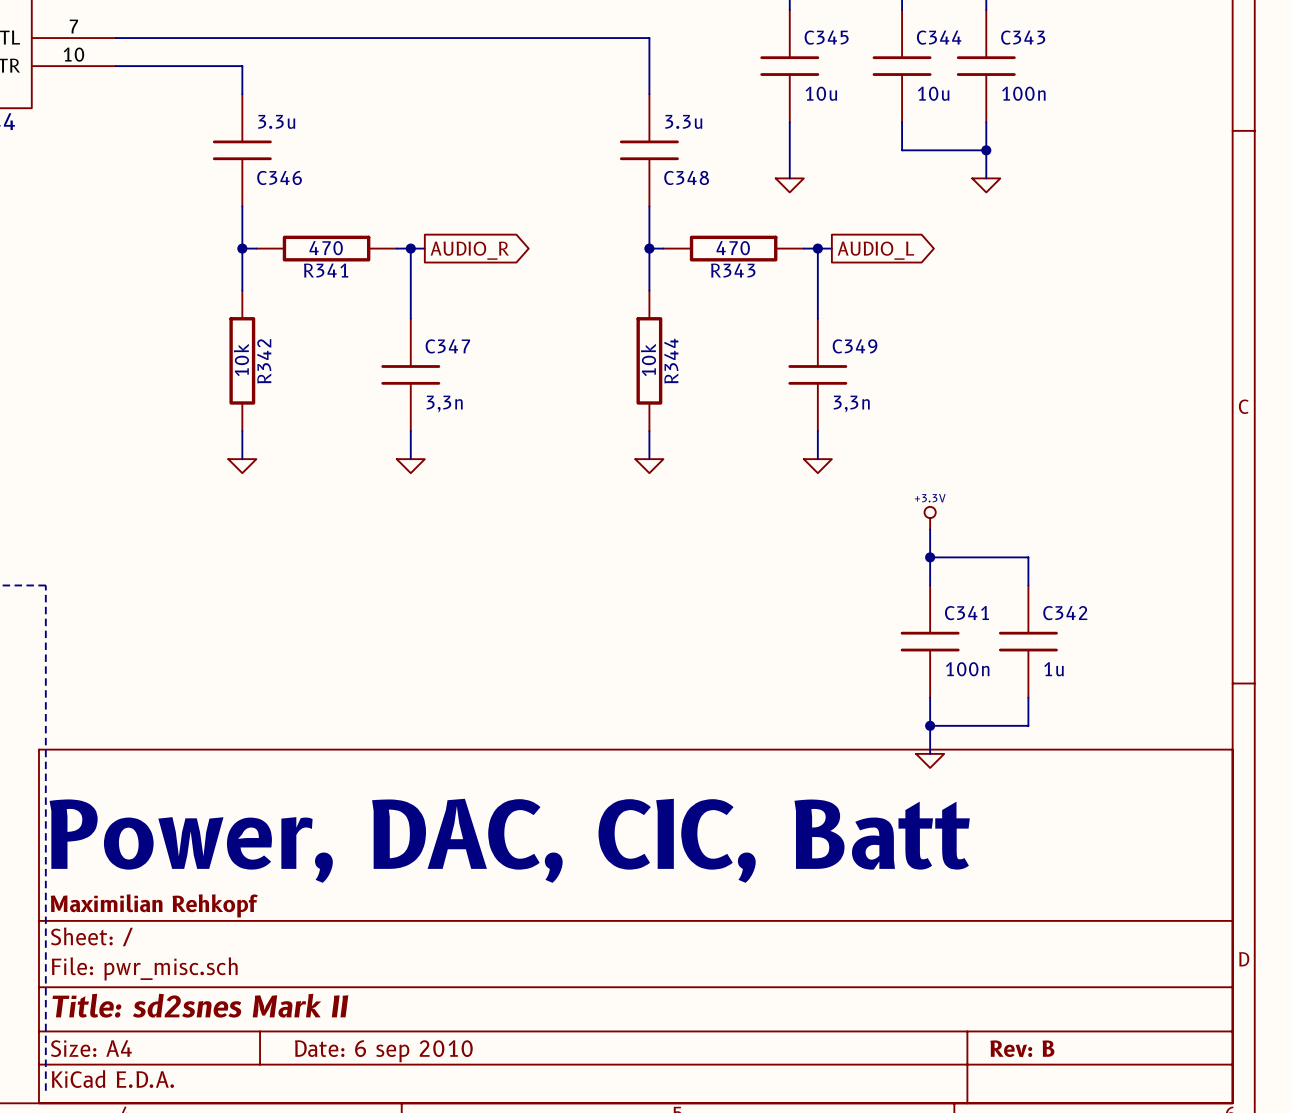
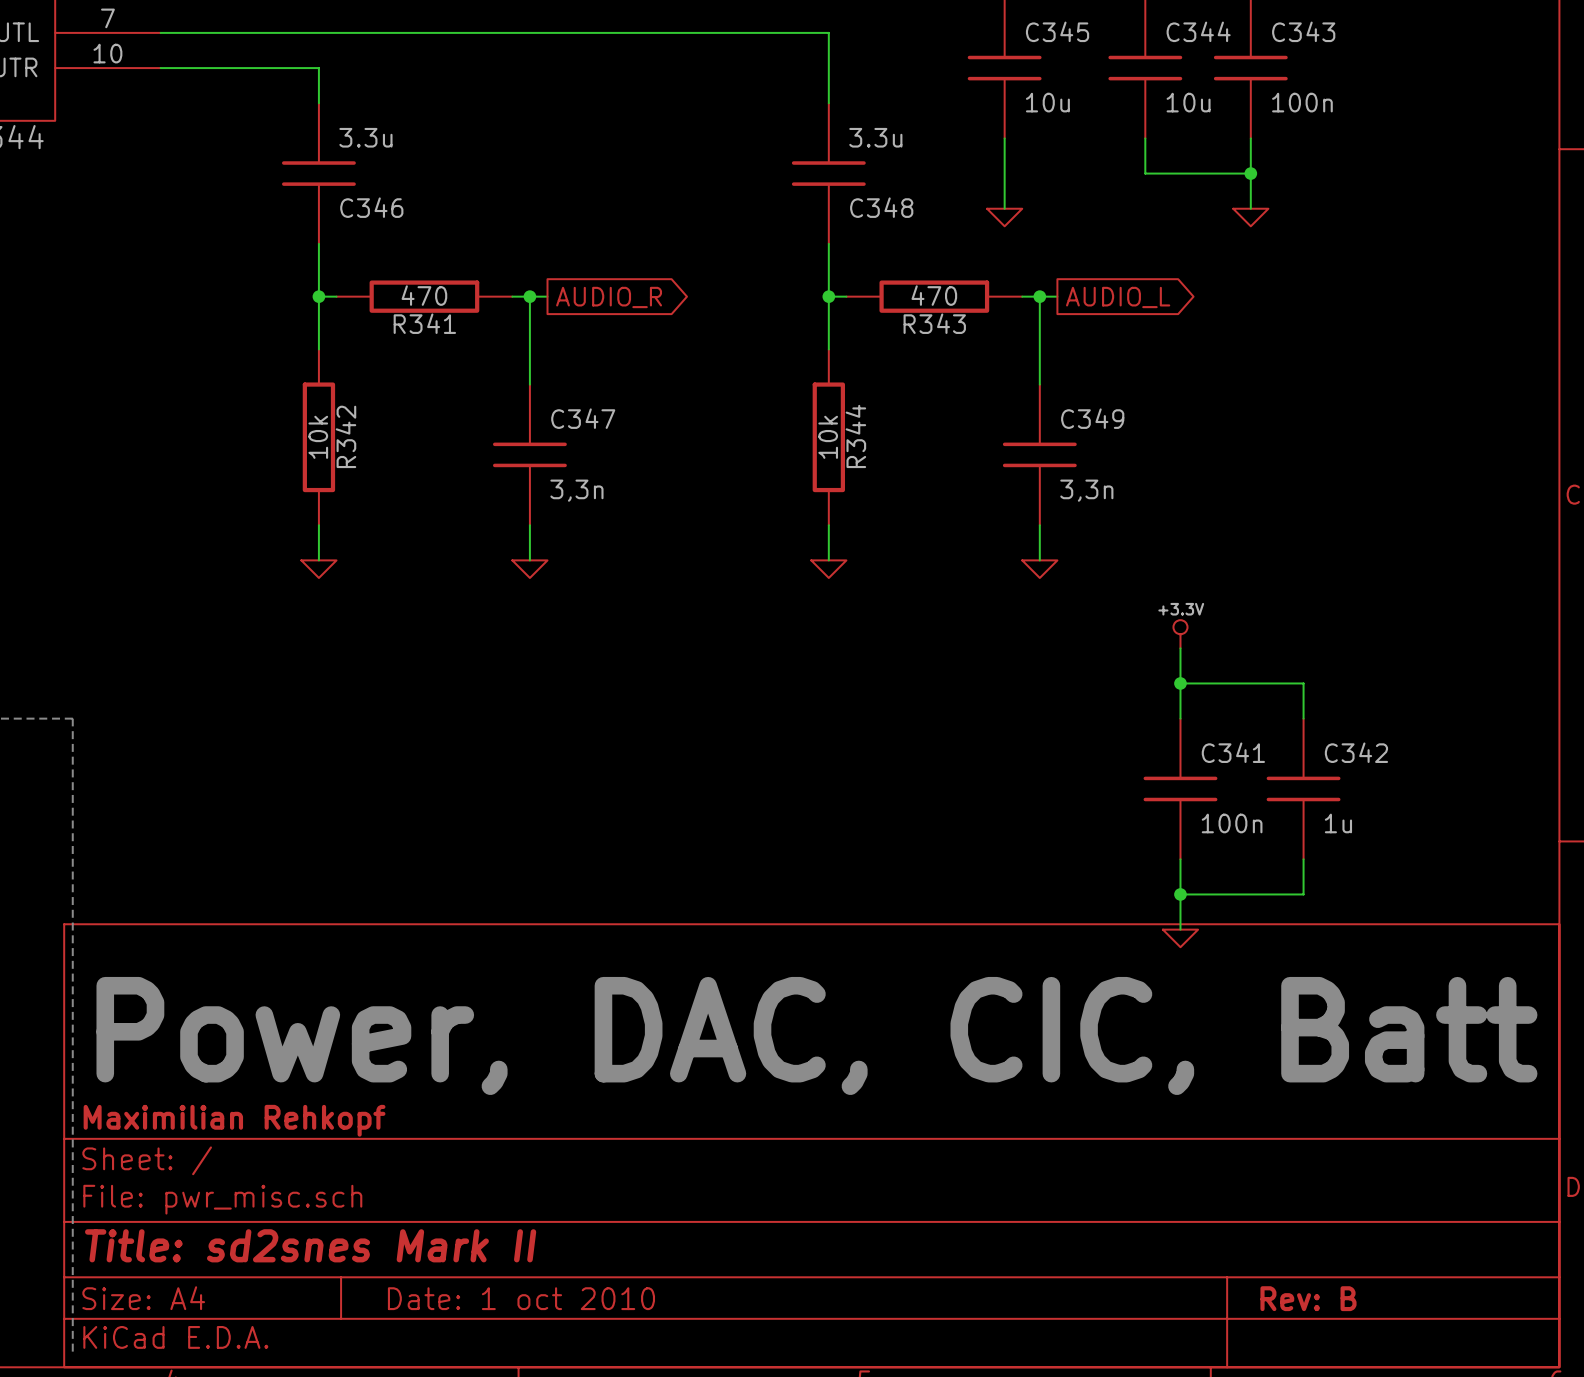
title block: Date: 6 sep 2010 (383, 1051) -> Date: 1 oct 2010 (521, 1298)

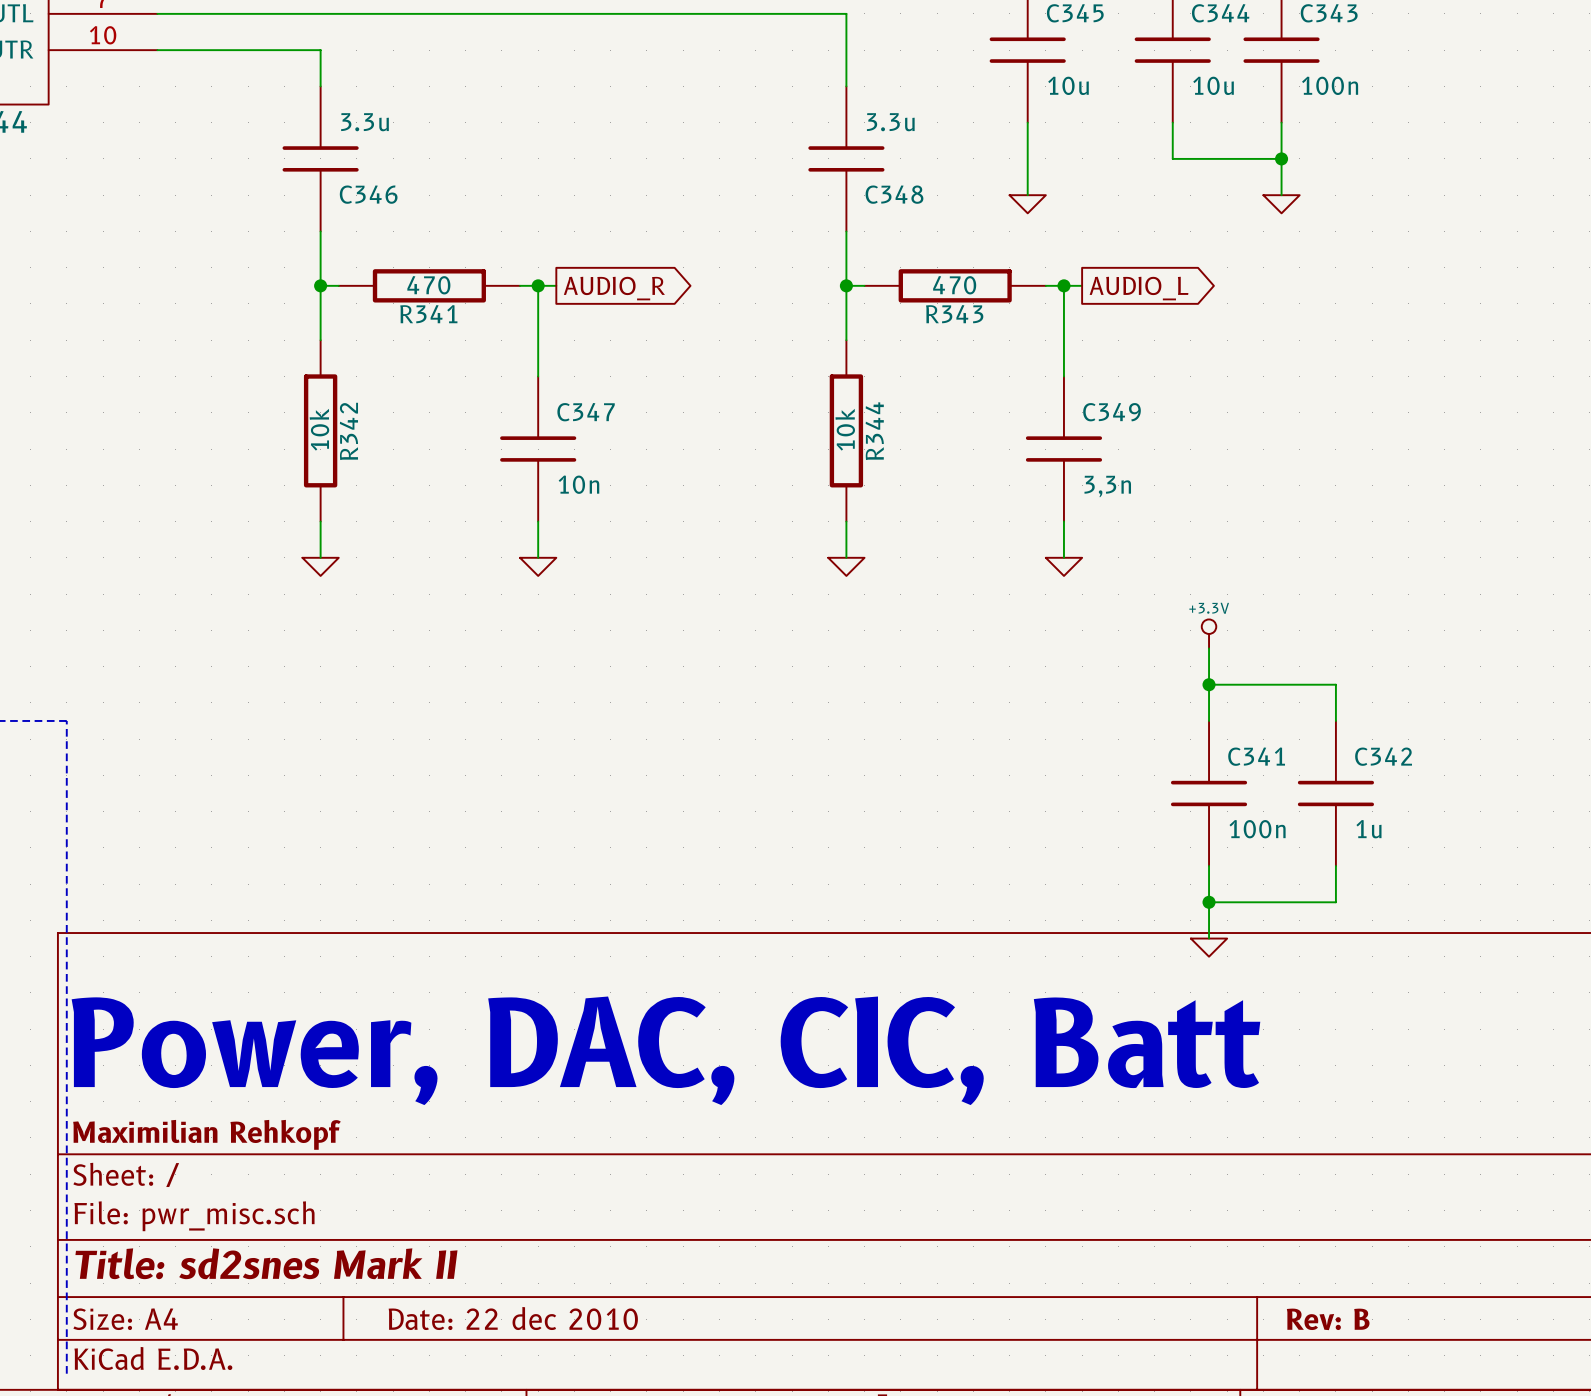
C347 value: 3,3n (576, 490) -> 10n (578, 484)
title block: Date: 1 oct 2010 (521, 1298) -> Date: 22 dec 2010 (513, 1318)

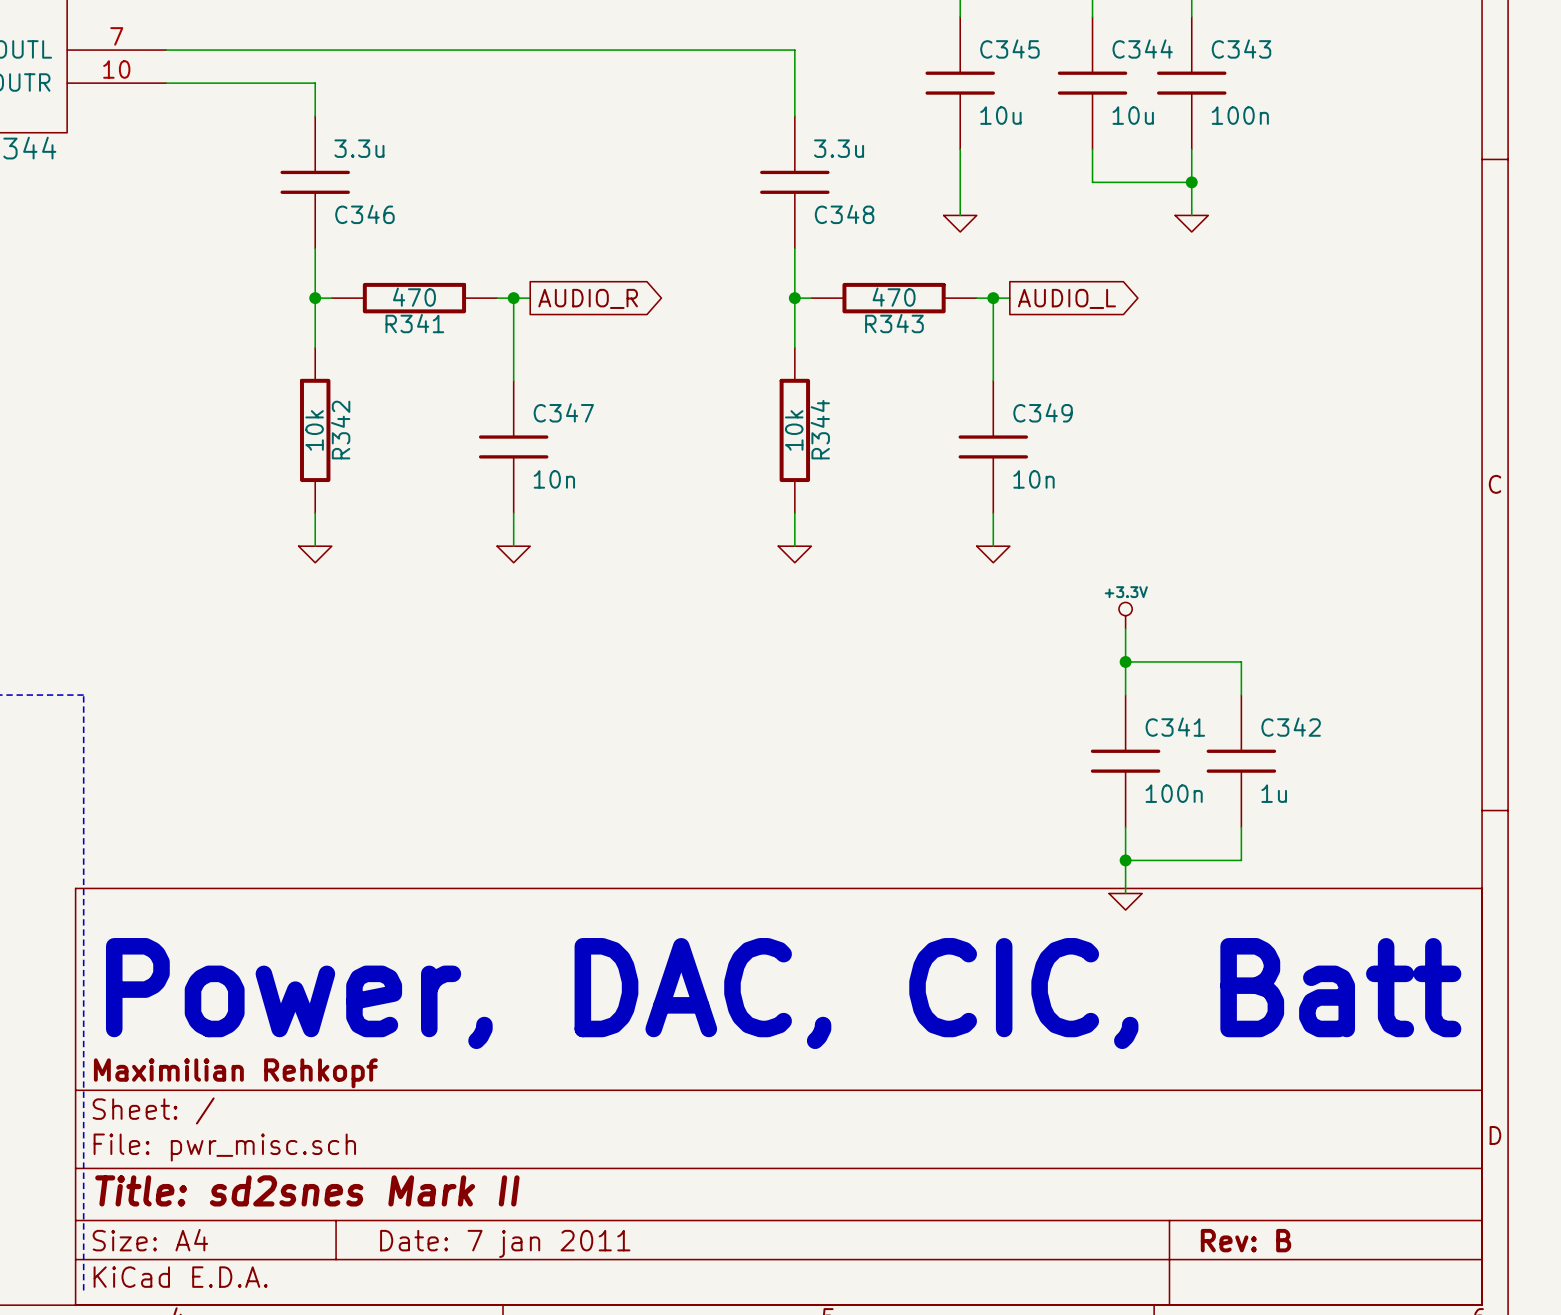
C349 value: 3,3n (1107, 486) -> 10n (1033, 479)
title block: Date: 22 dec 2010 (513, 1318) -> Date: 7 jan 2011 (505, 1243)

